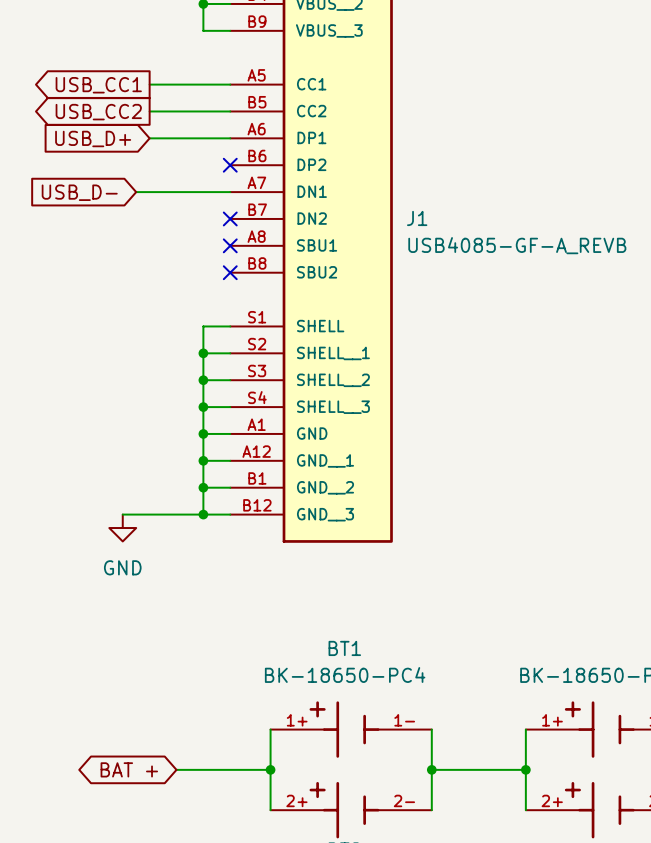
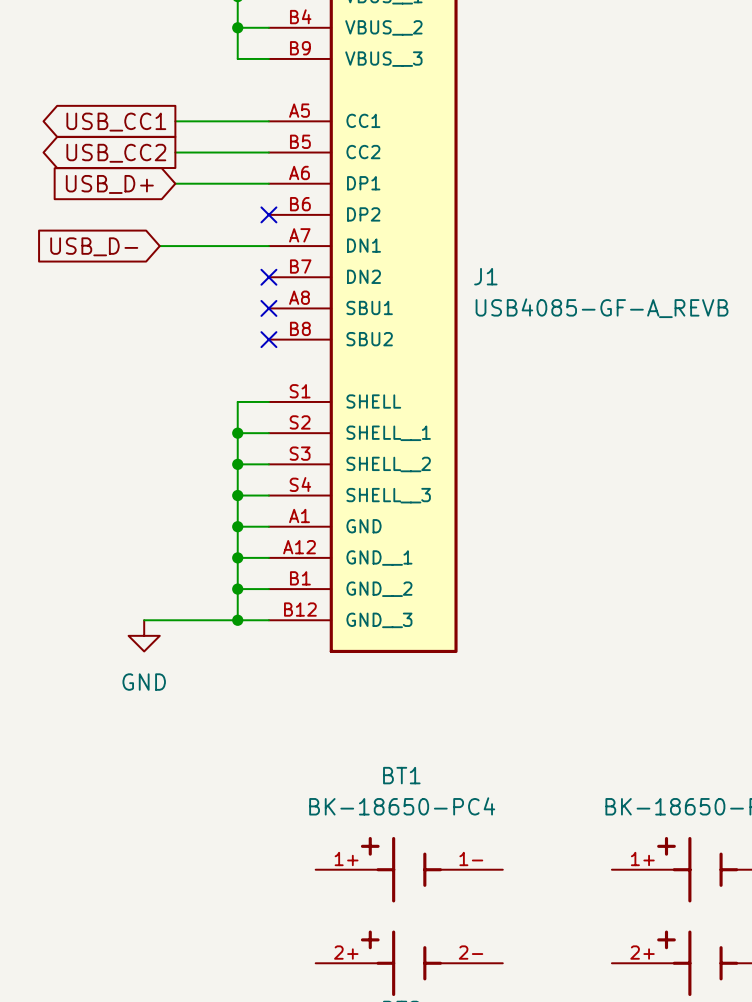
wire: (270, 729) (270, 810) -> none
wire: (431, 729) (431, 810) -> none
wire: (525, 729) (525, 810) -> none
global label: BAT + (129, 769) -> none
wire: (176, 769) (270, 769) -> none
junction: (270, 769) -> none
wire: (431, 769) (525, 769) -> none
junction: (431, 769) -> none
junction: (525, 769) -> none

